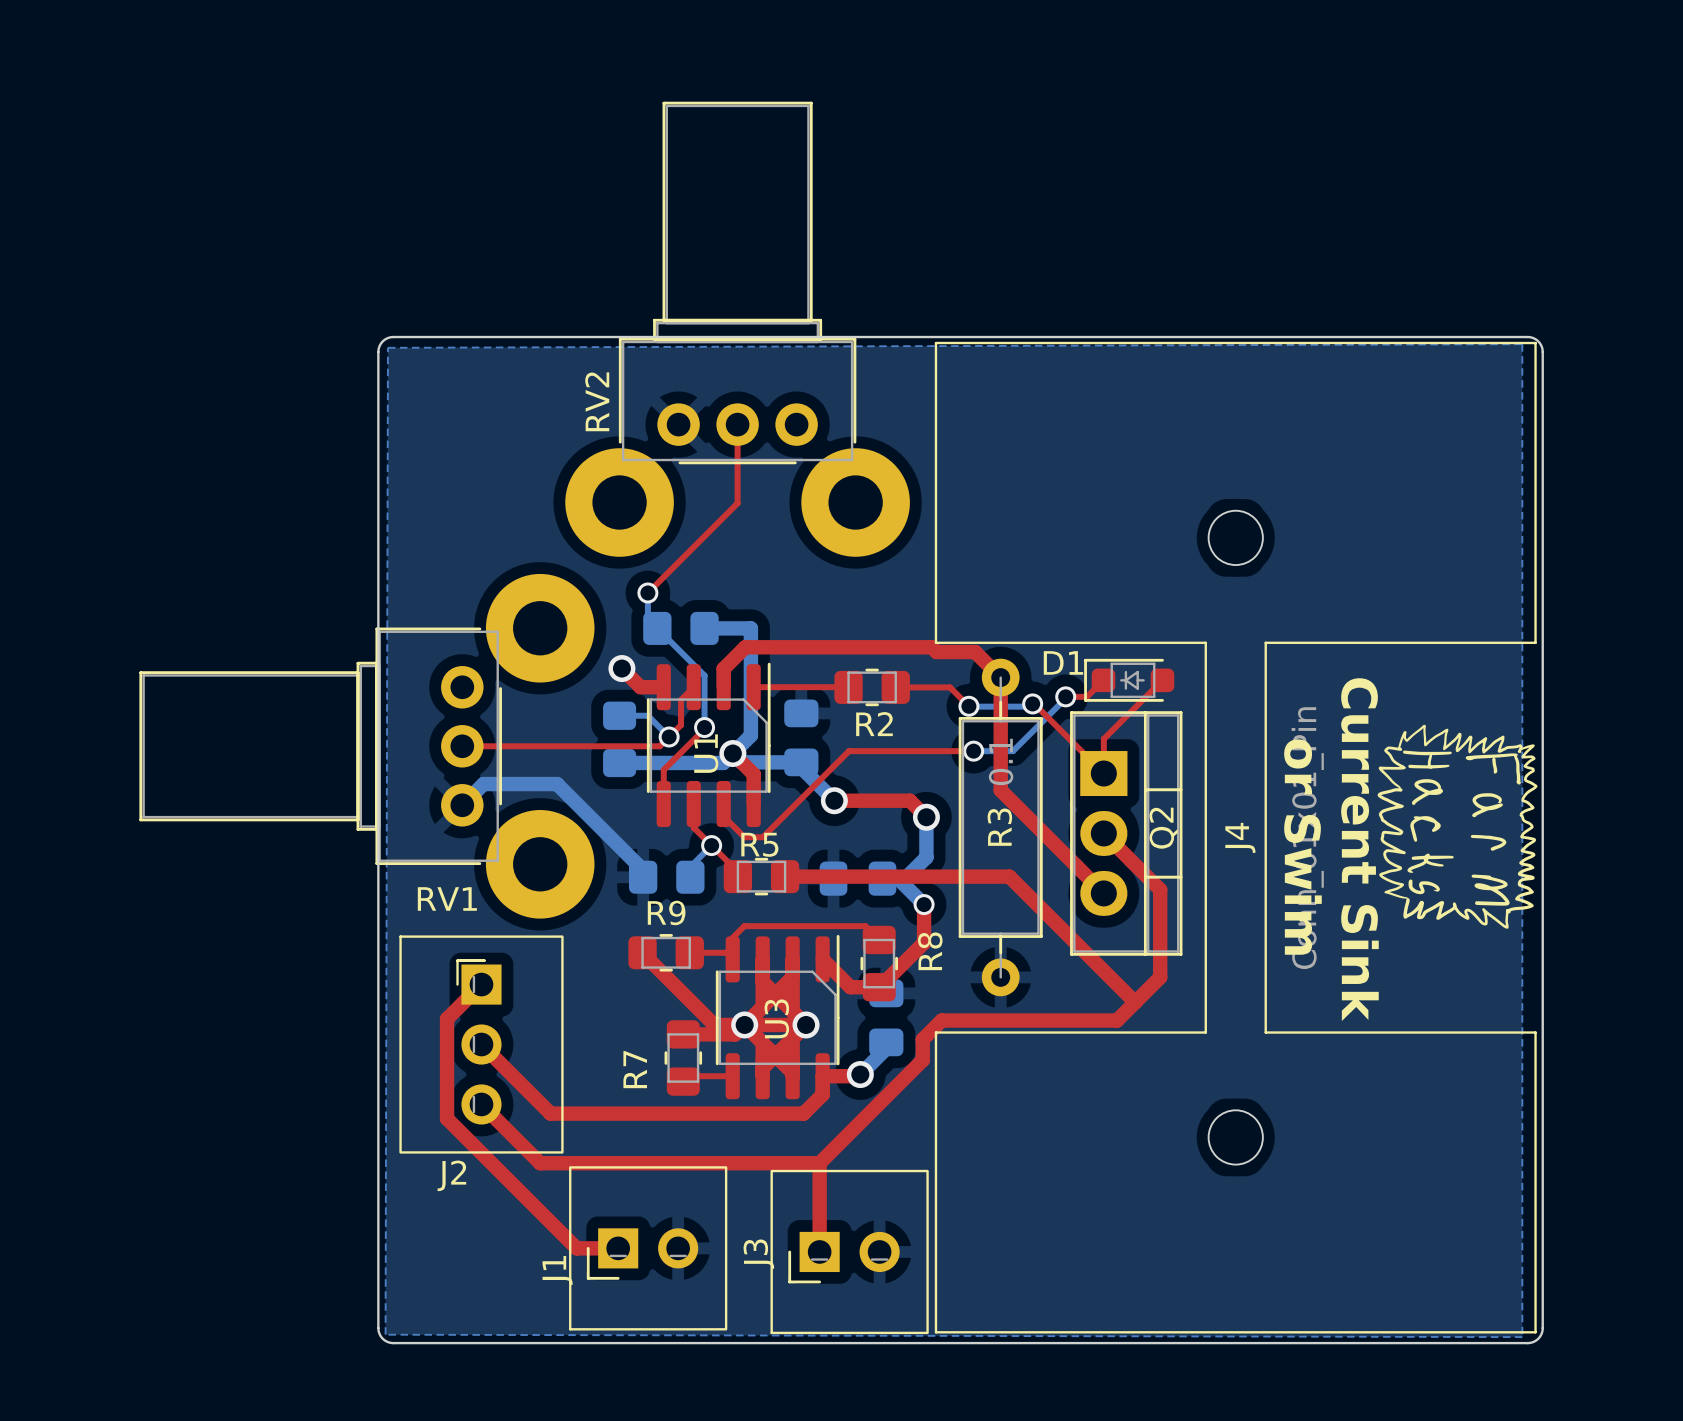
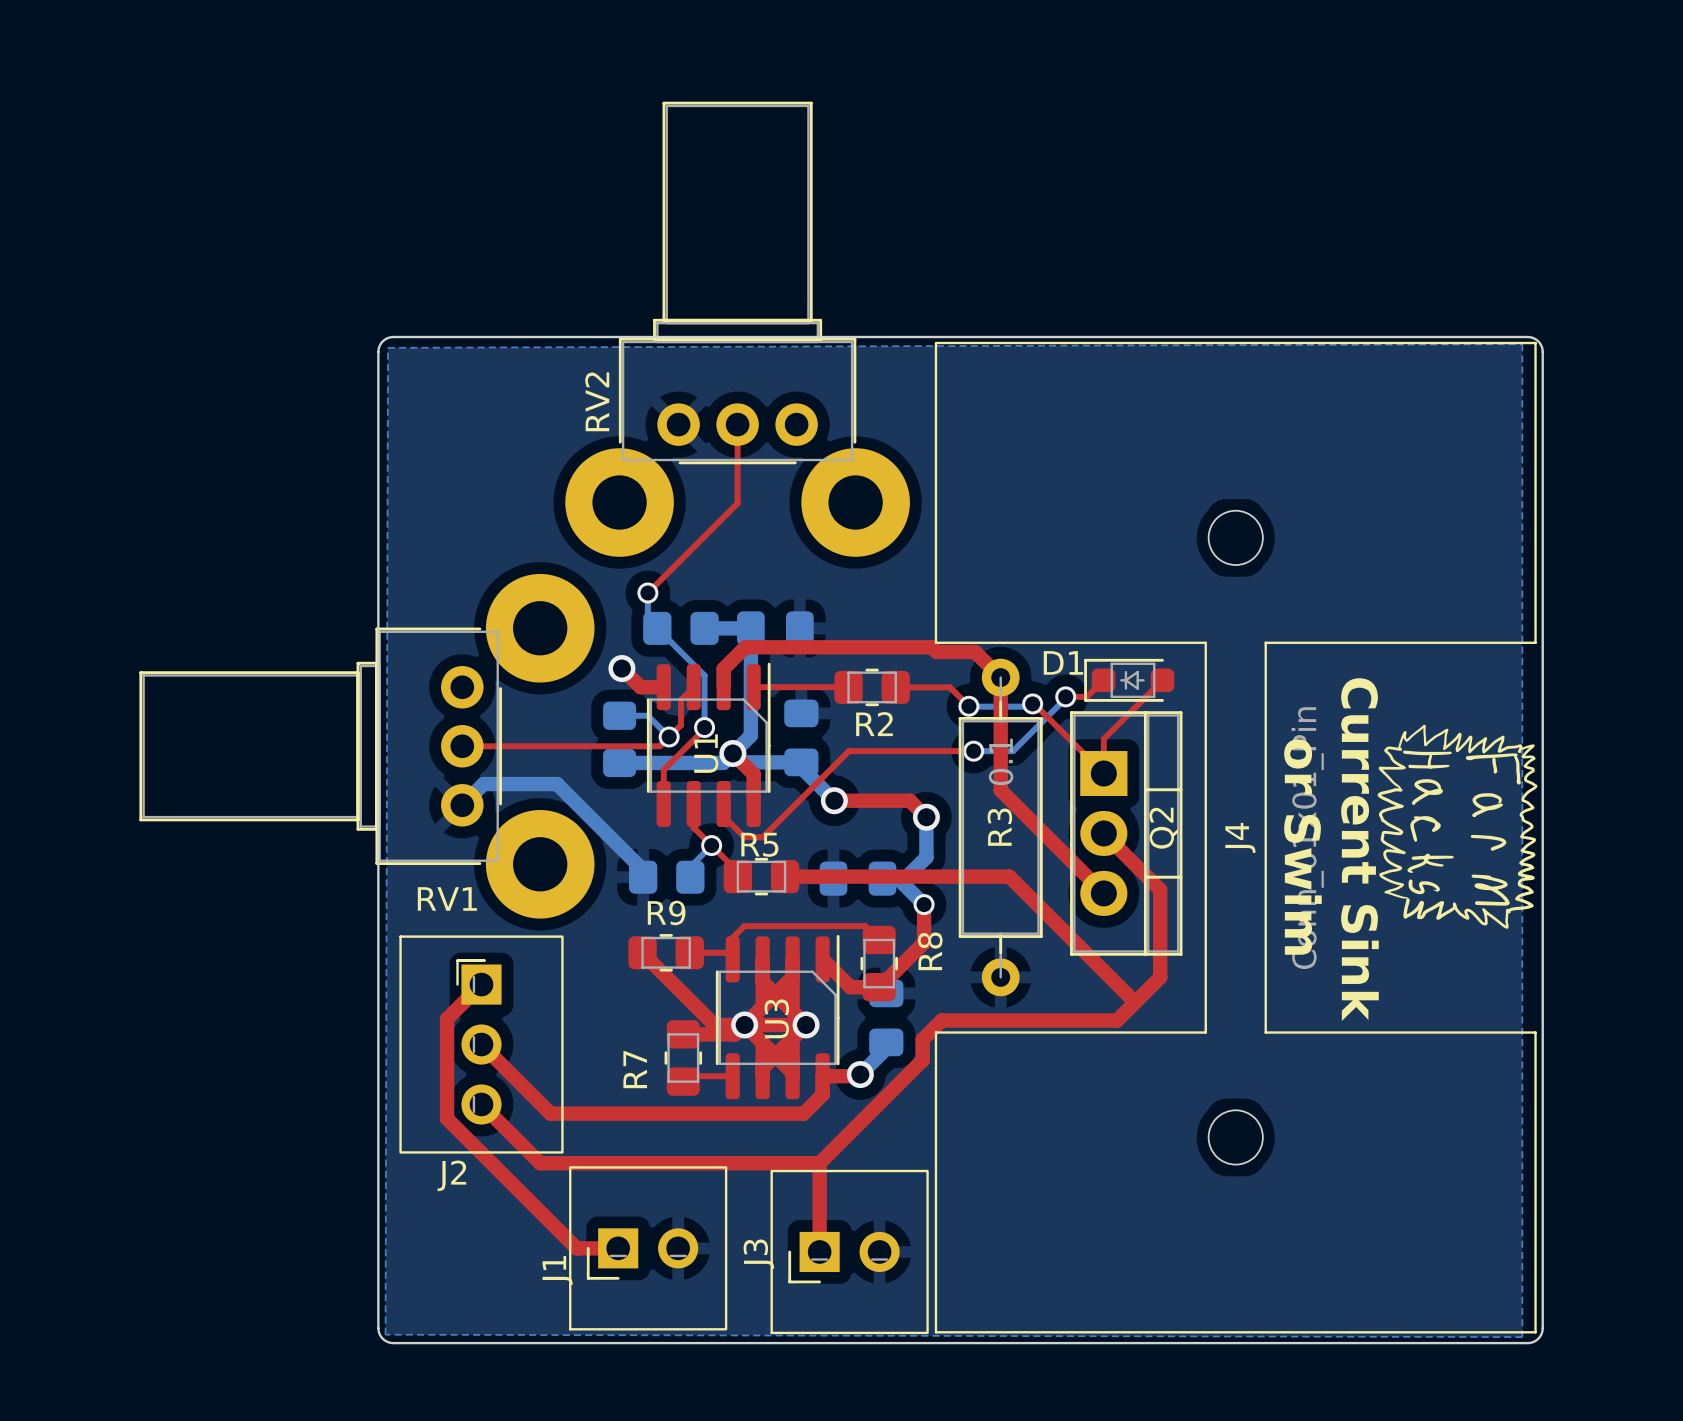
part: none -> (775, 628)

